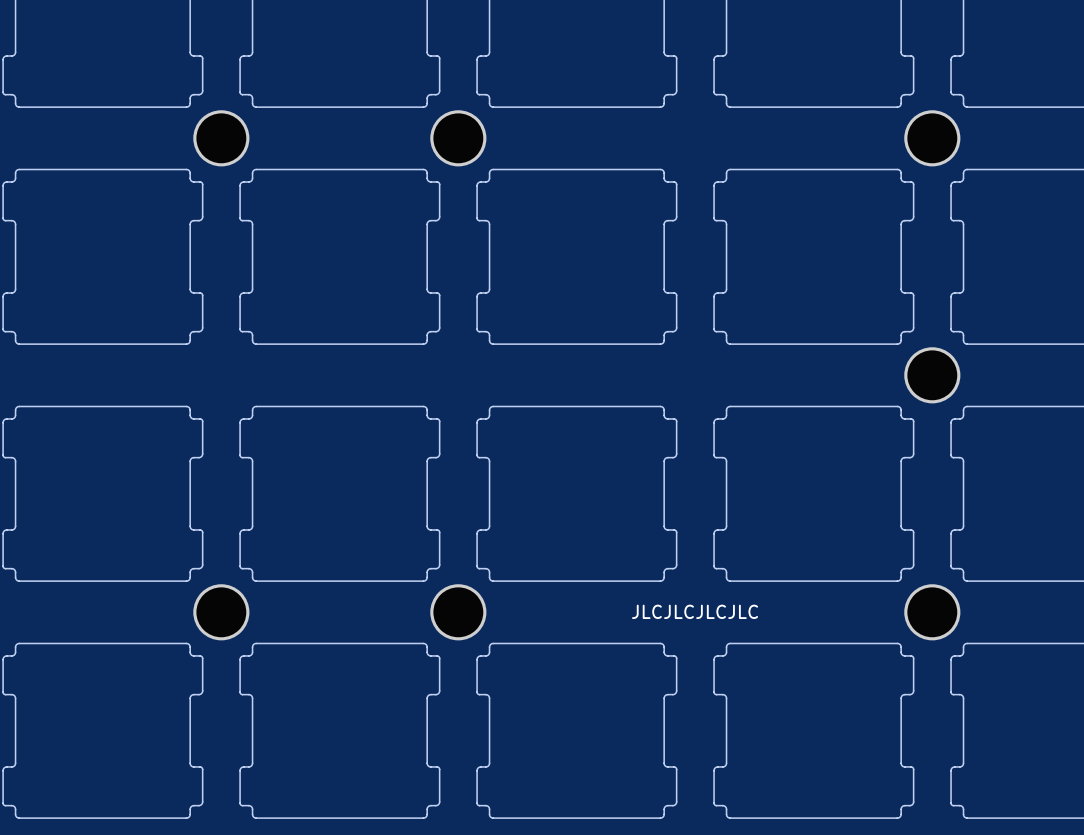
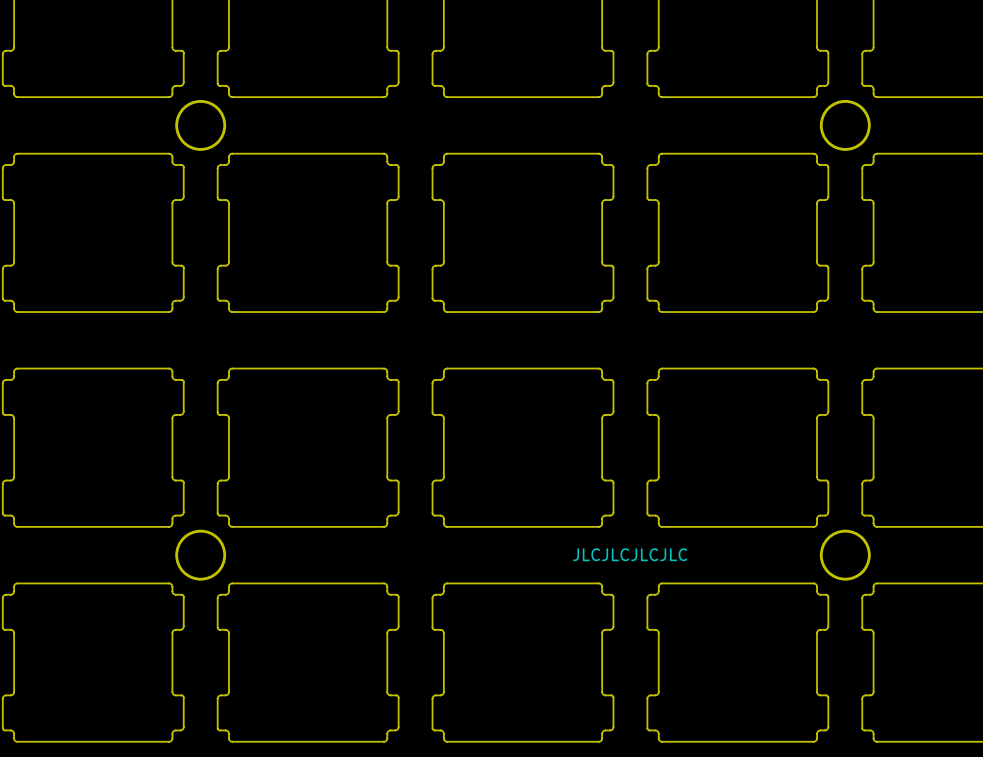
part: (458, 138) -> none
part: (932, 375) -> none
part: (458, 612) -> none

